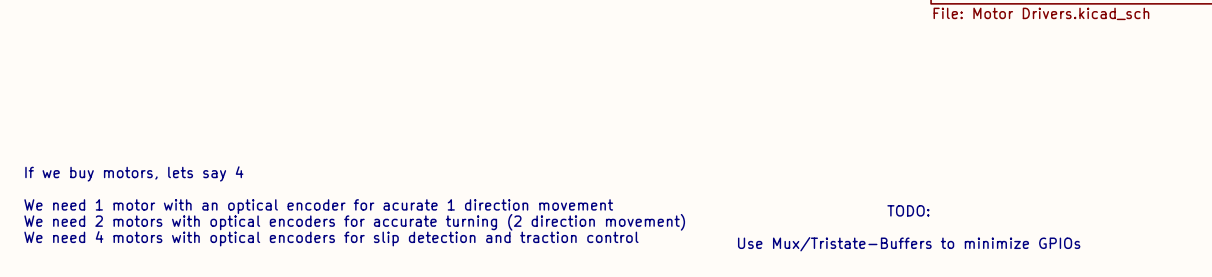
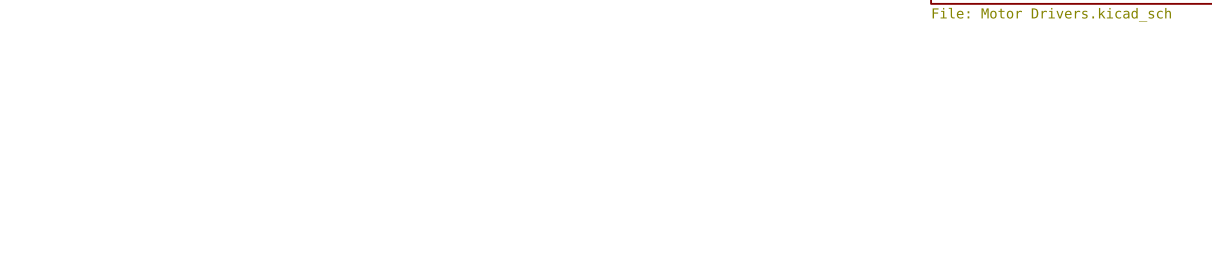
text: If we buy motors, lets say 4 (134, 173) -> none
text: We need 1 motor with an optical encoder for acurate 1 direction movement (318, 206) -> none
text: TODO: (908, 210) -> none
text: We need 2 motors with optical encoders for accurate turning (2 direction movement) (354, 222) -> none
text: We need 4 motors with optical encoders for slip detection and traction control (331, 238) -> none
text: Use Mux/Tristate-Buffers to minimize GPIOs (909, 244) -> none

